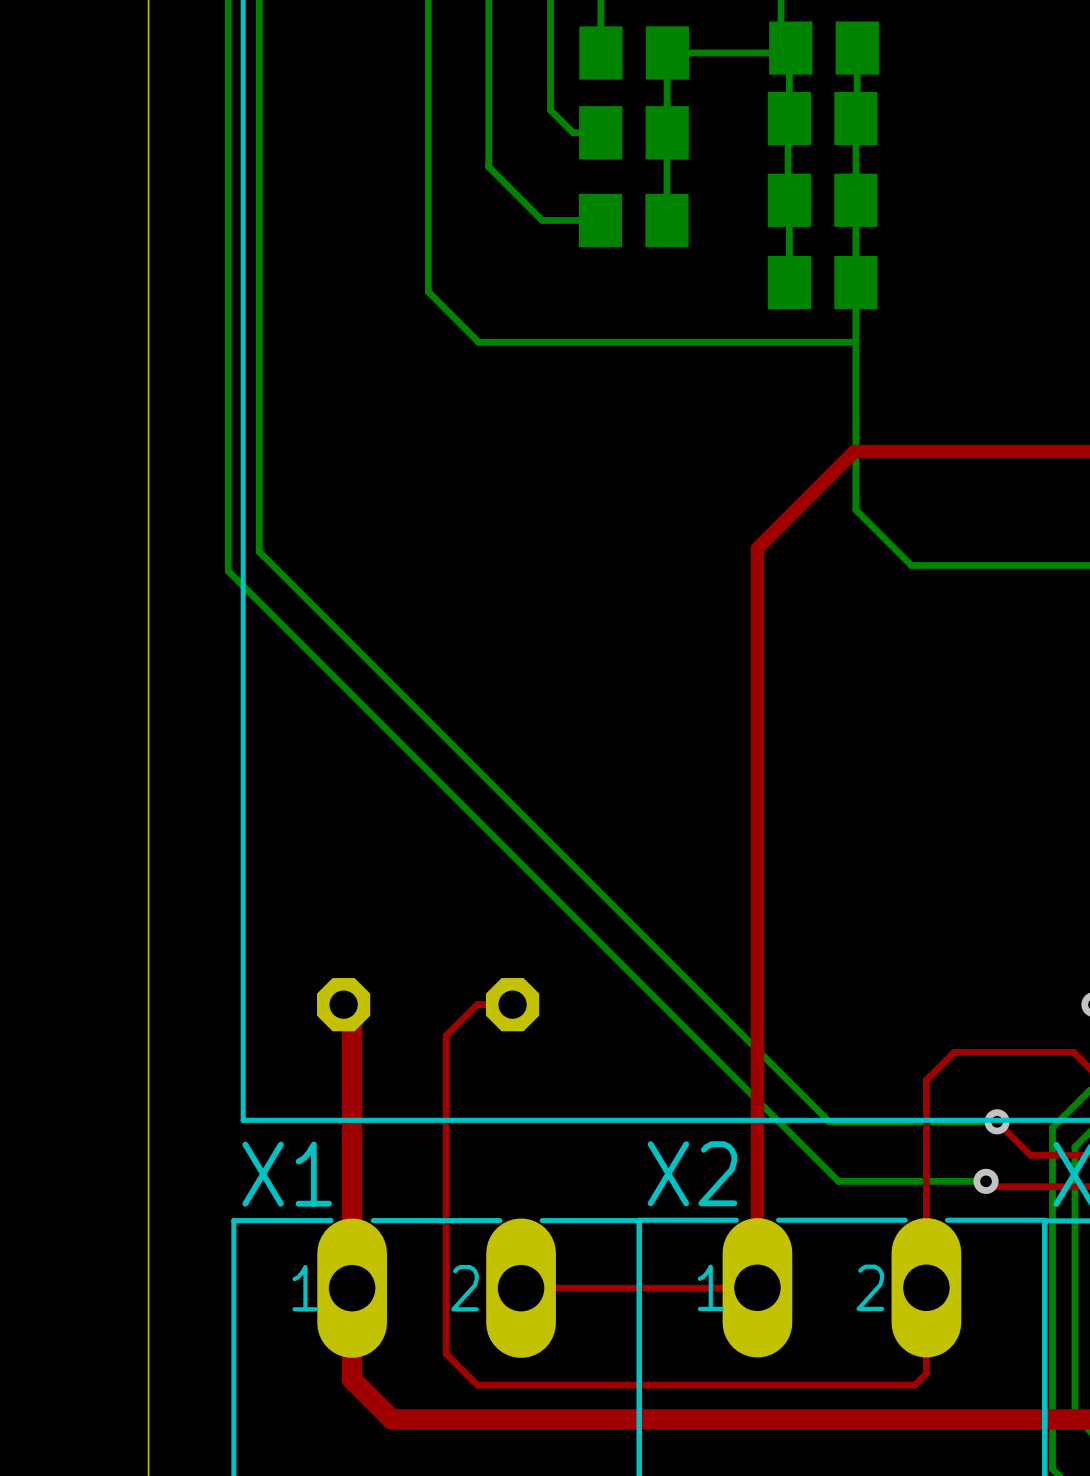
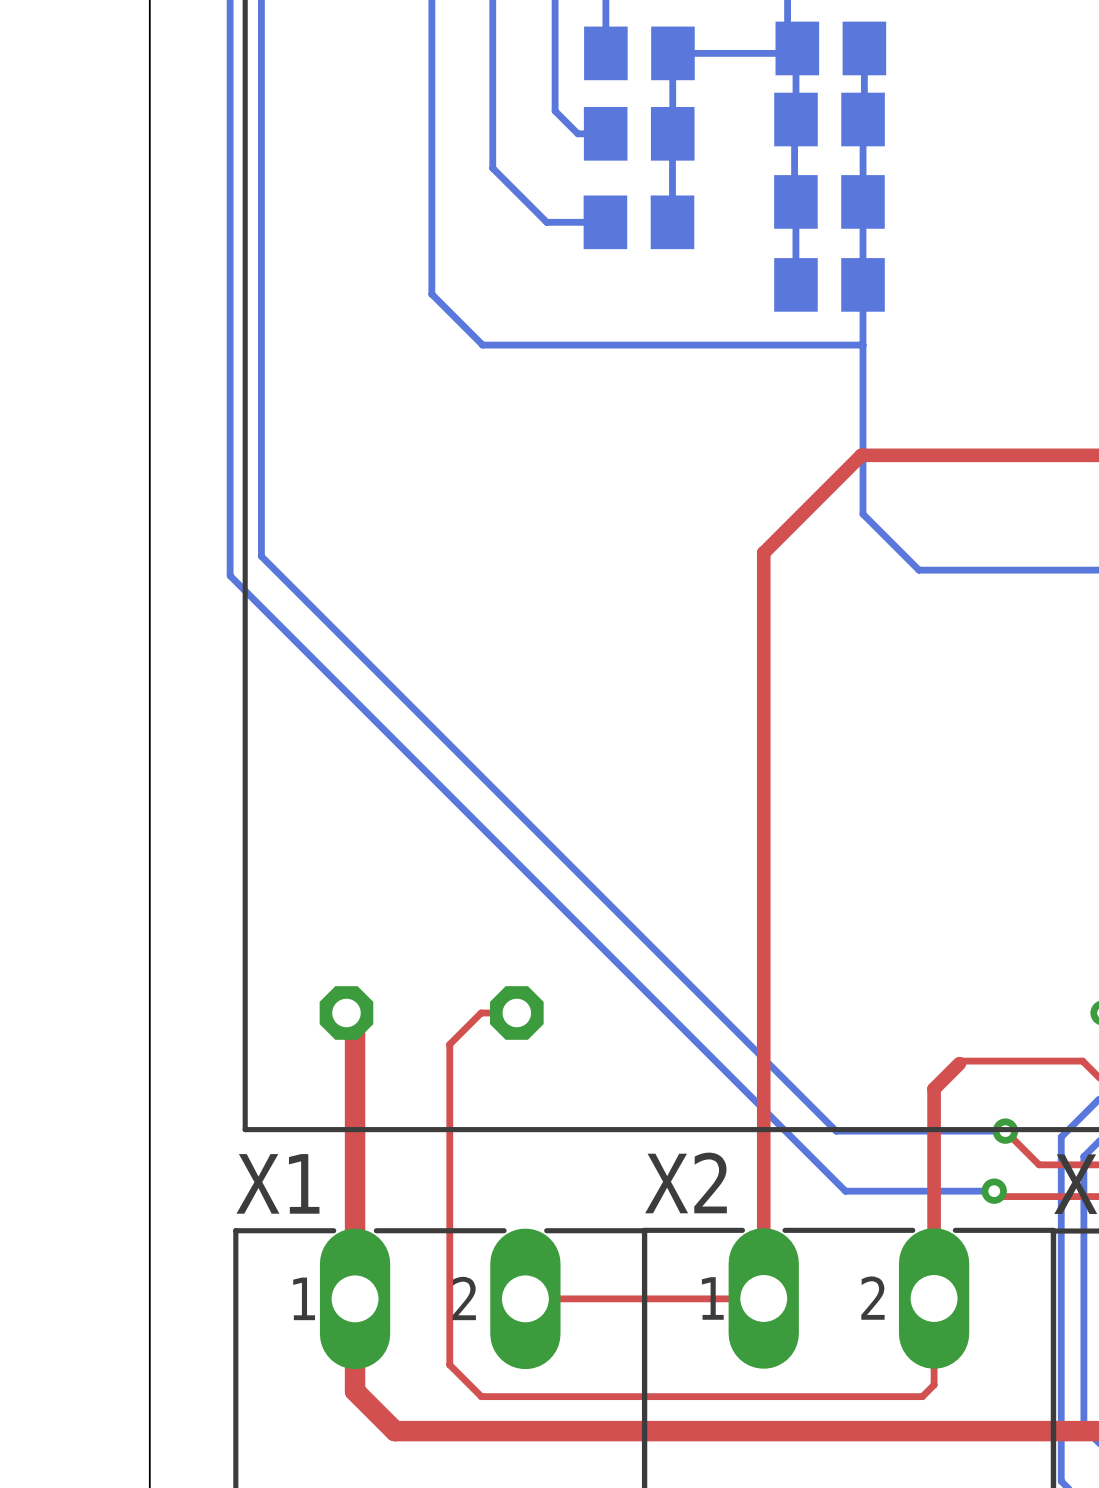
top track width: thin (951, 1054) (926, 1080) (926, 1287) -> thick (959, 1063) (934, 1089) (934, 1298)

